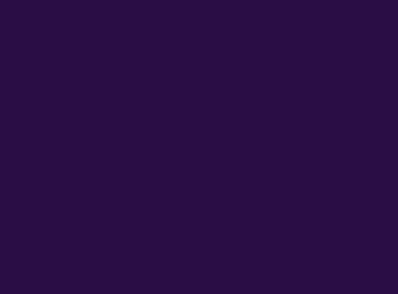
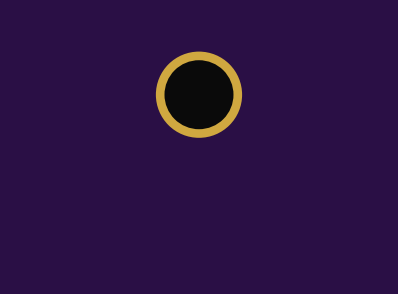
via: none -> (198, 94)

